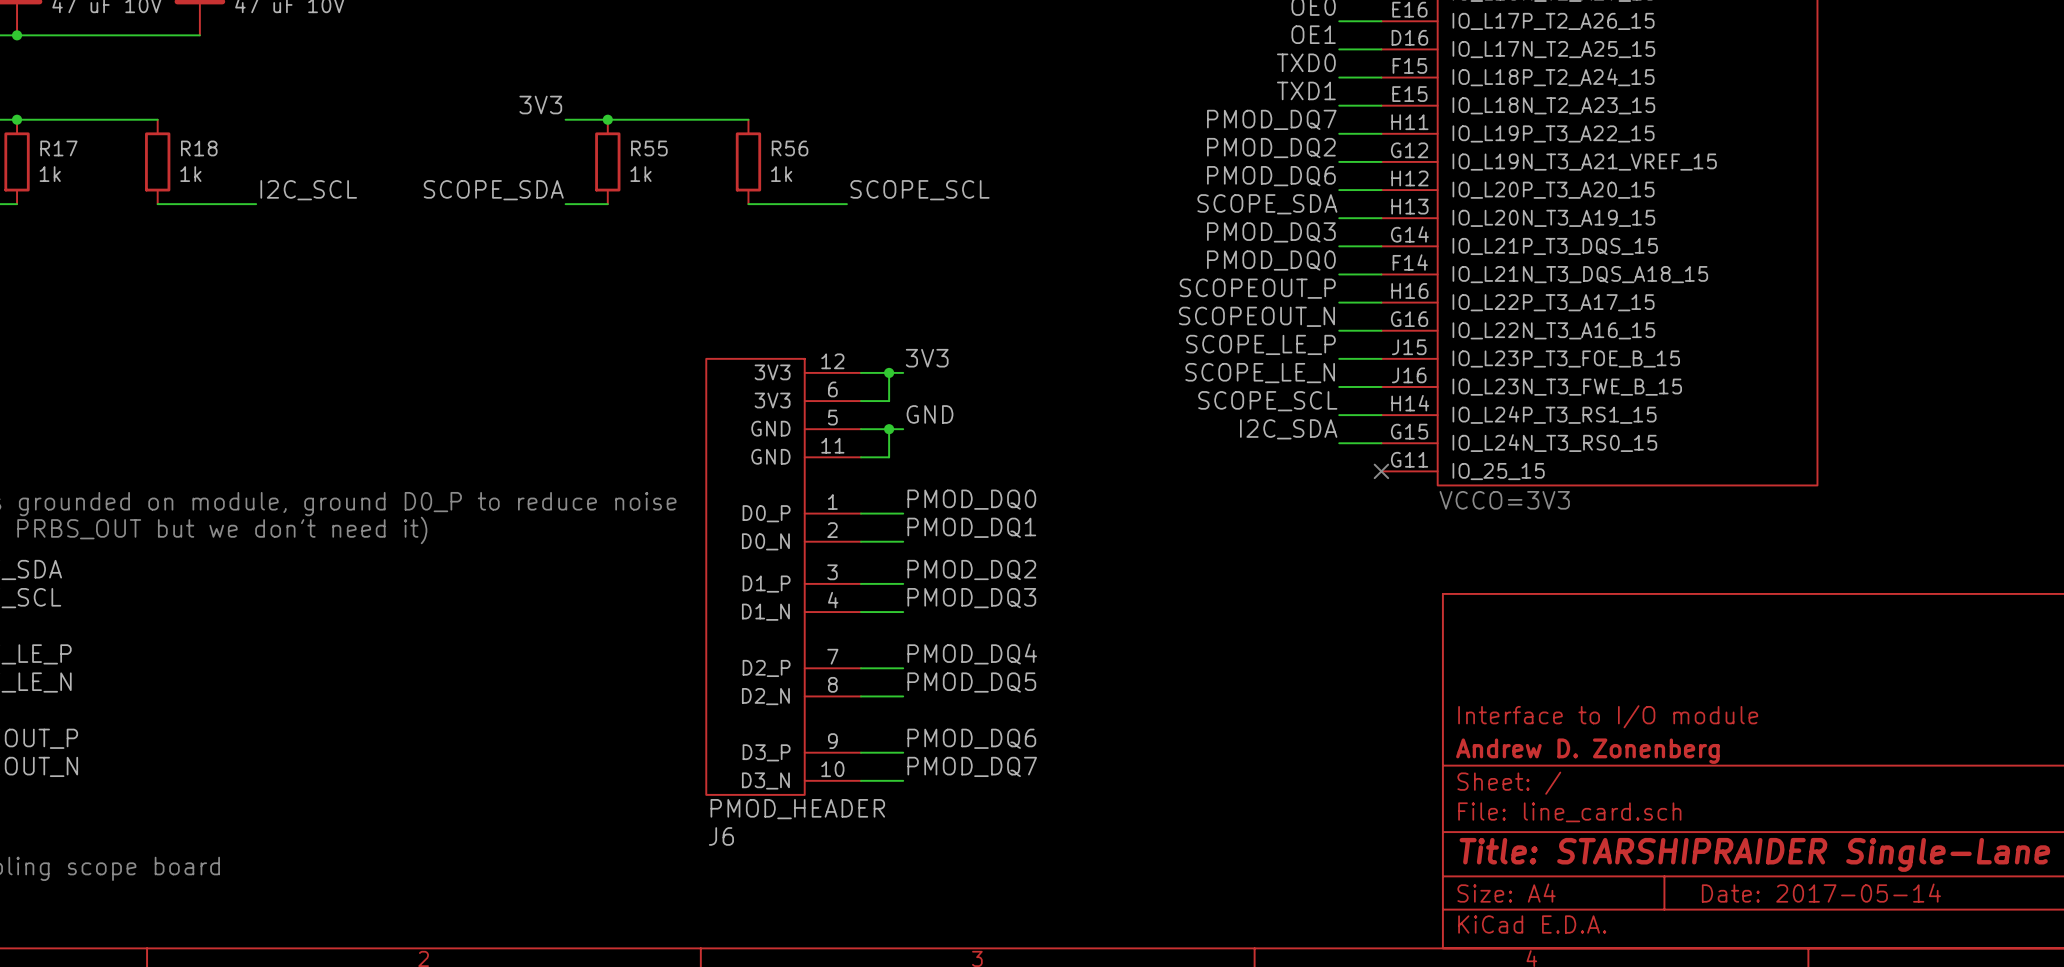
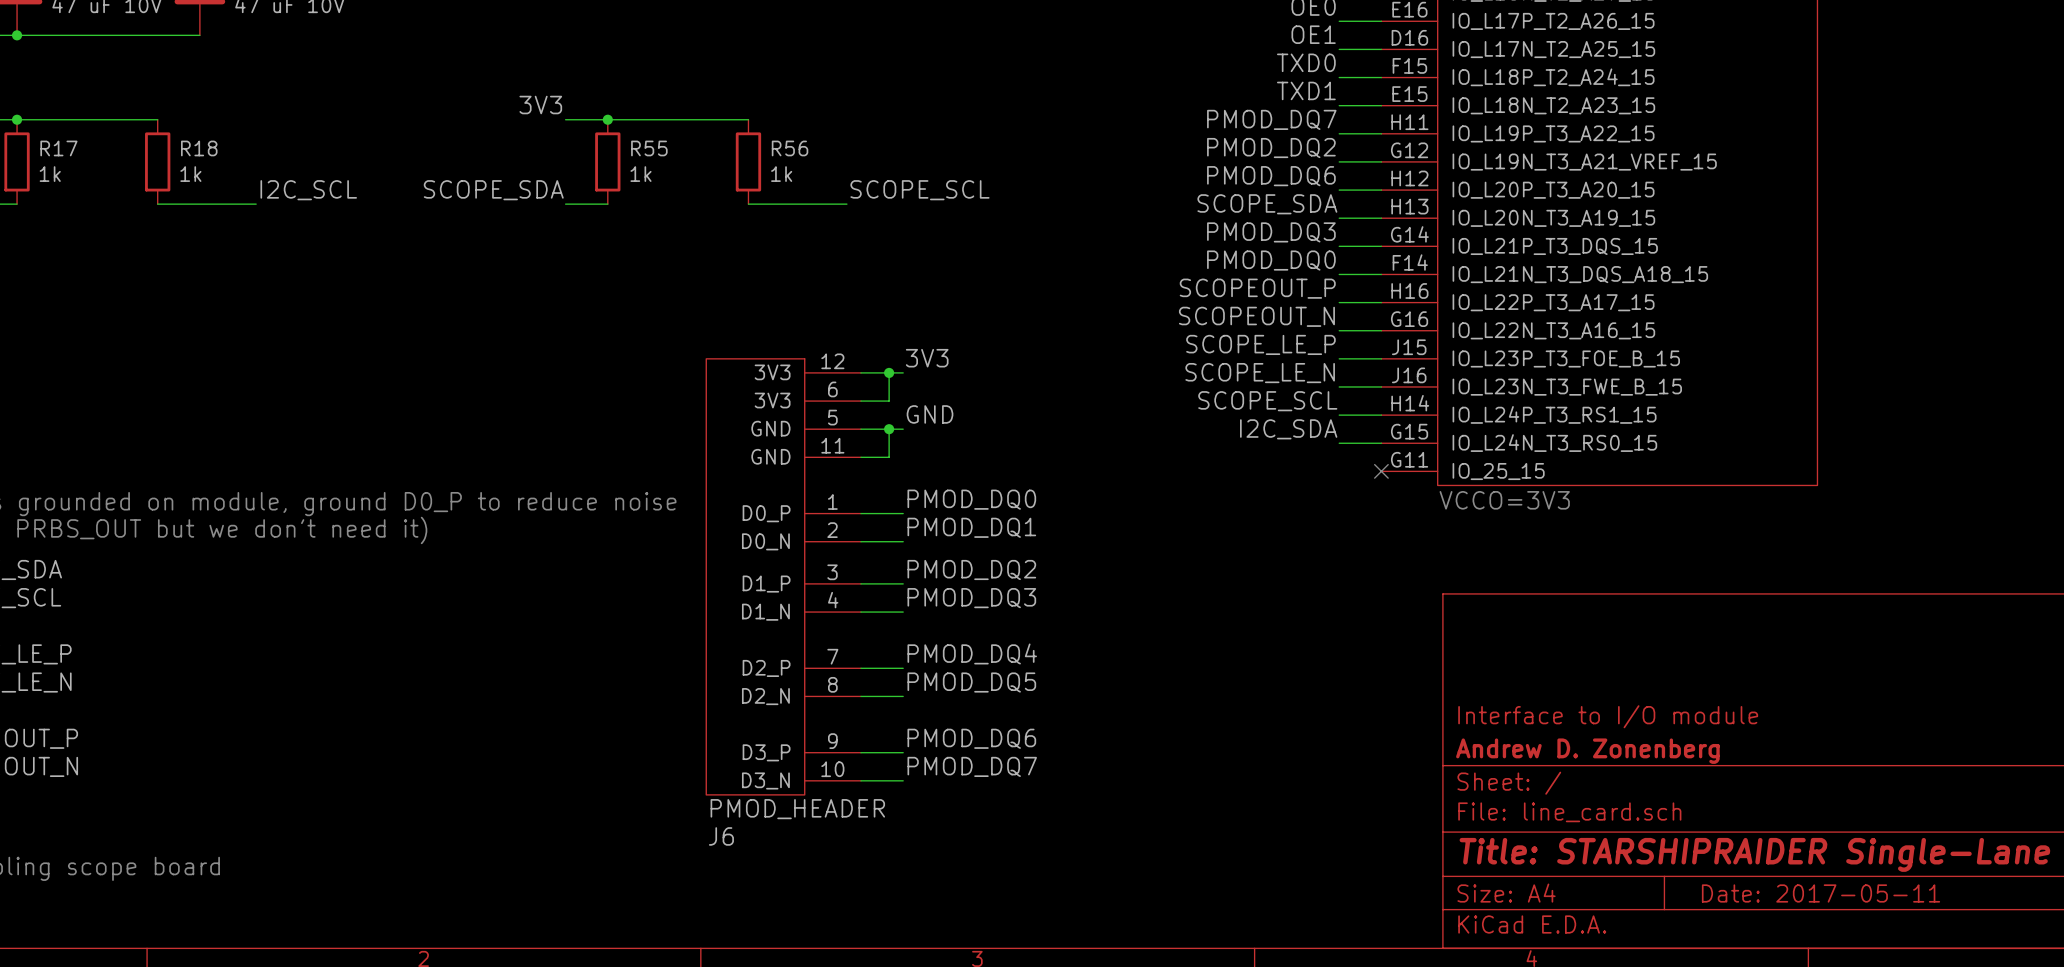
title block: Date: 2017-05-14 (1821, 893) -> Date: 2017-05-11 (1820, 893)

